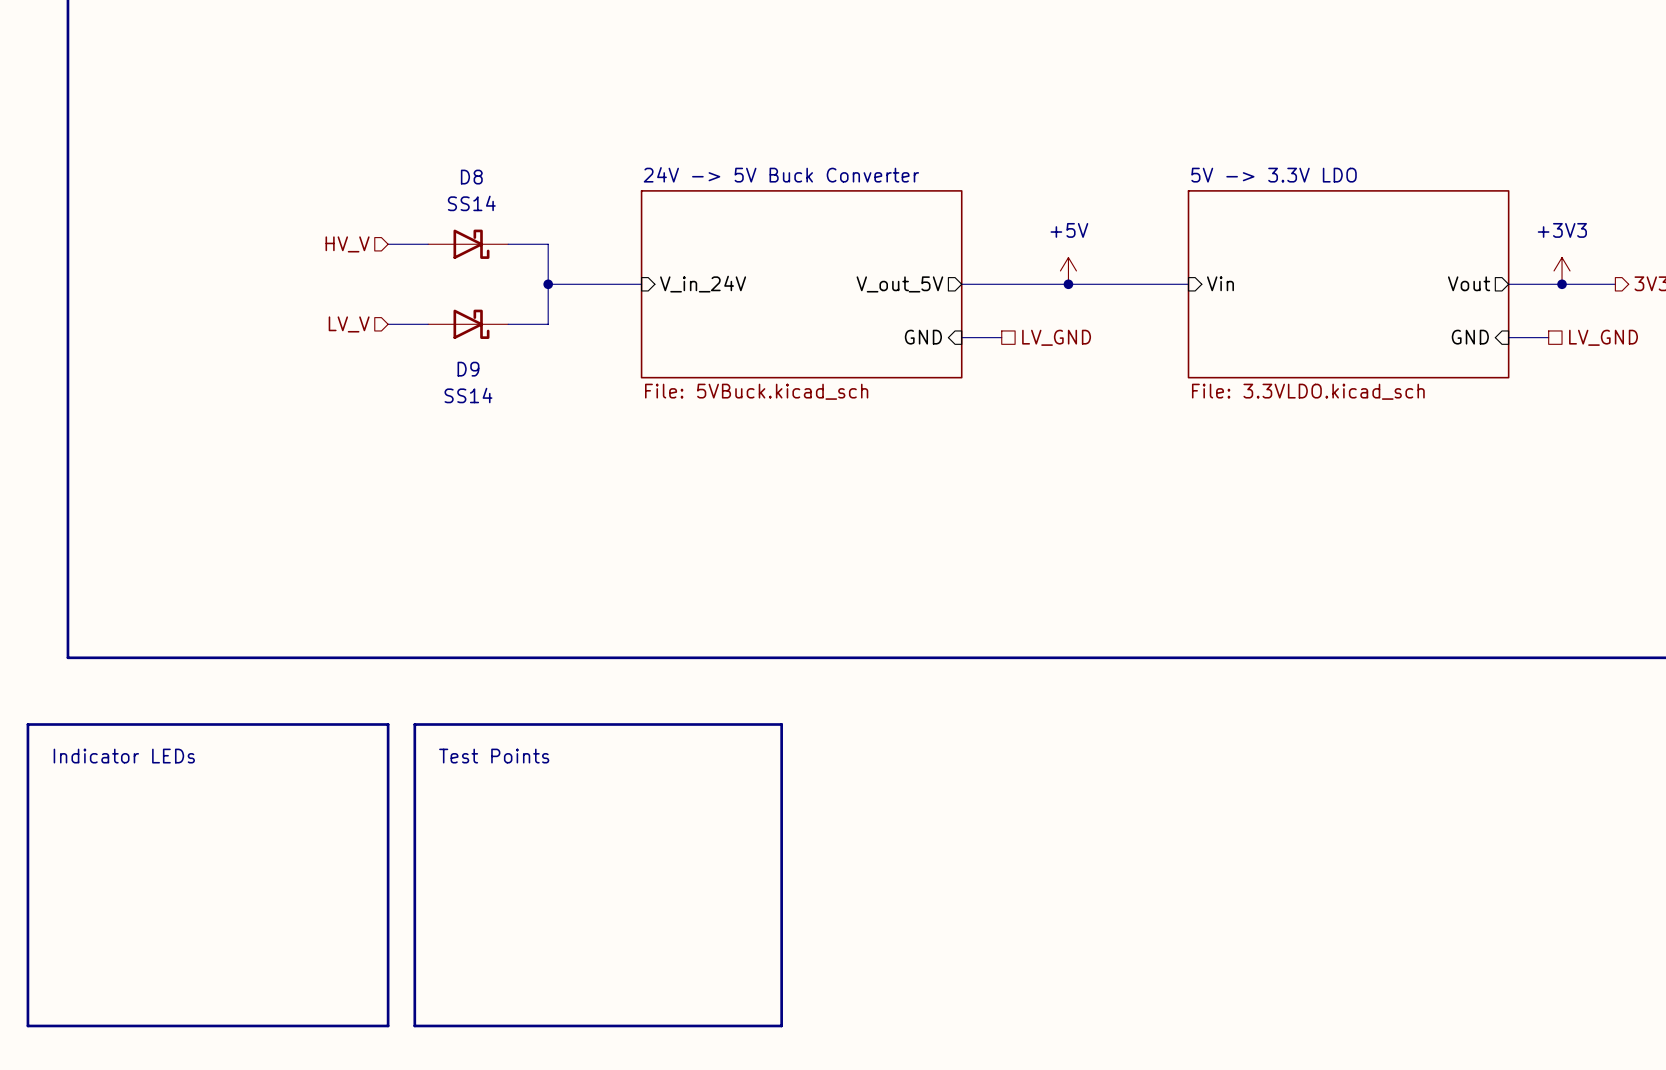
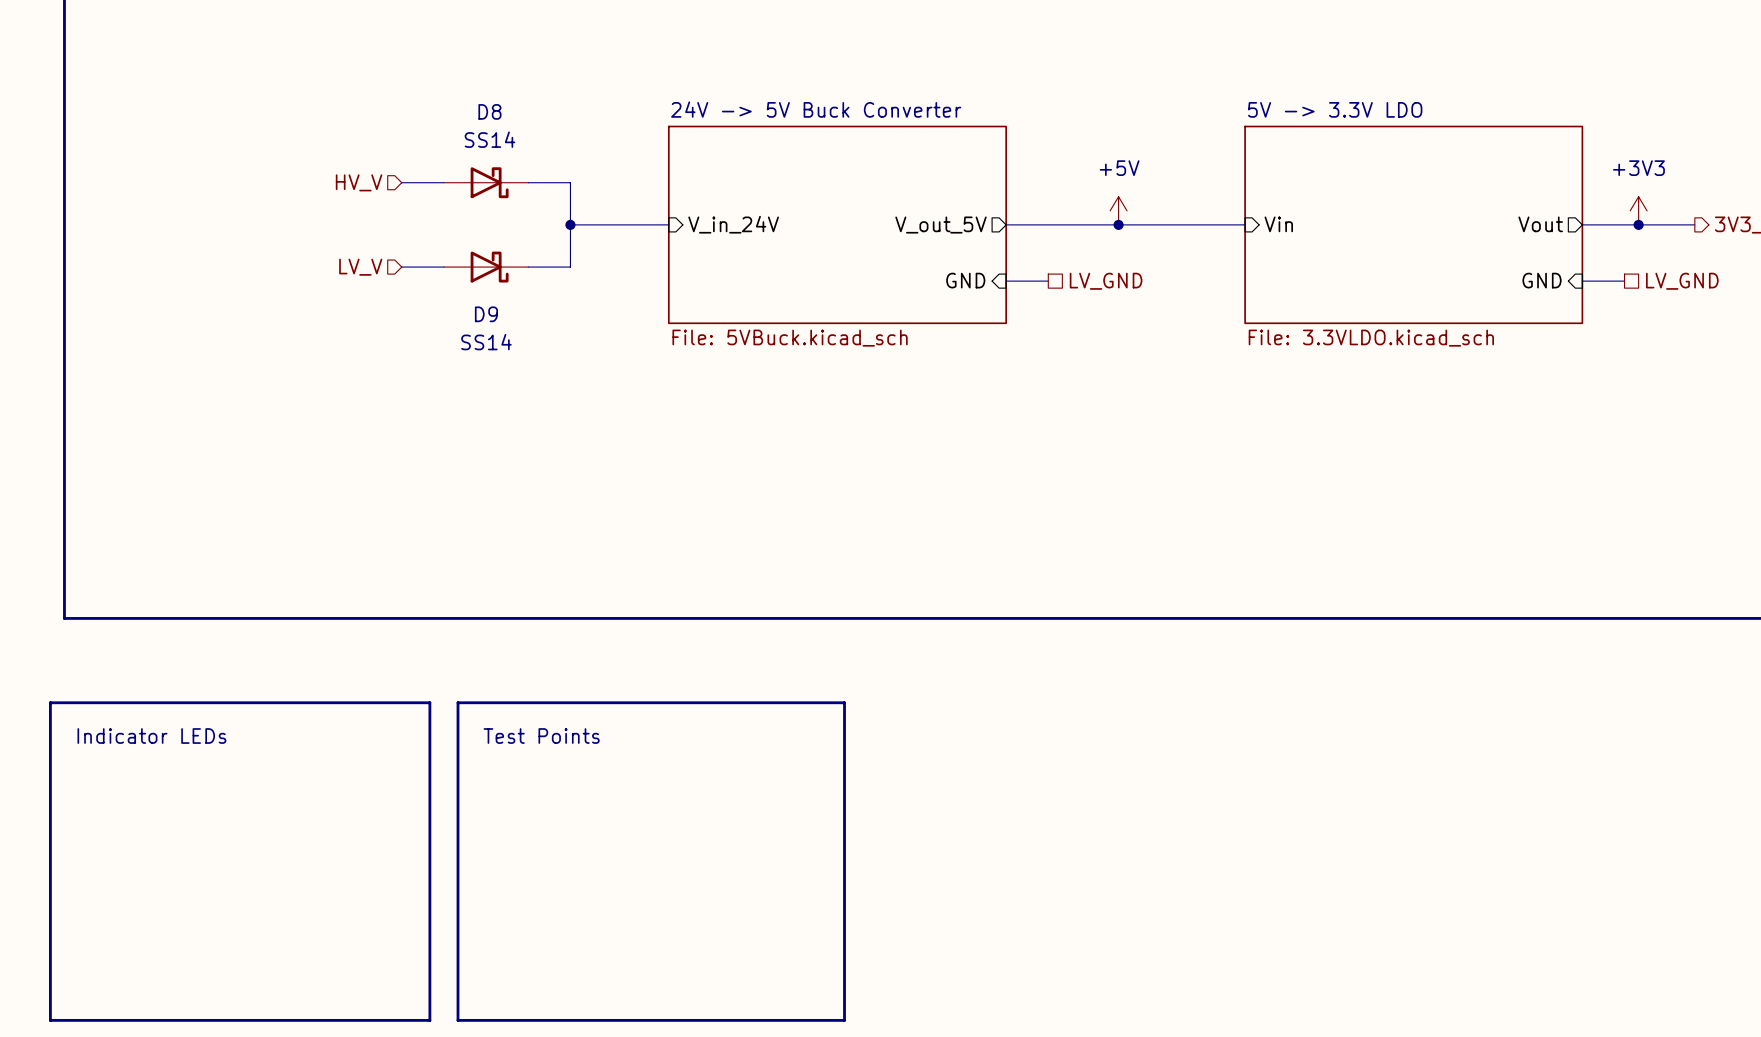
line: (27, 724) (388, 724) (388, 1025) (27, 1025) (27, 724) -> none
line: (414, 737) (414, 724) (781, 724) (781, 1025) (414, 1025) -> (429, 702) (50, 702) (50, 1020) (429, 1020) (429, 1006)
line: none -> (458, 702) (844, 702) (844, 1020) (458, 1020) (458, 702)
text position: Indicator LEDs (124, 756) -> Indicator LEDs (151, 736)
text position: Test Points (494, 756) -> Test Points (541, 736)

